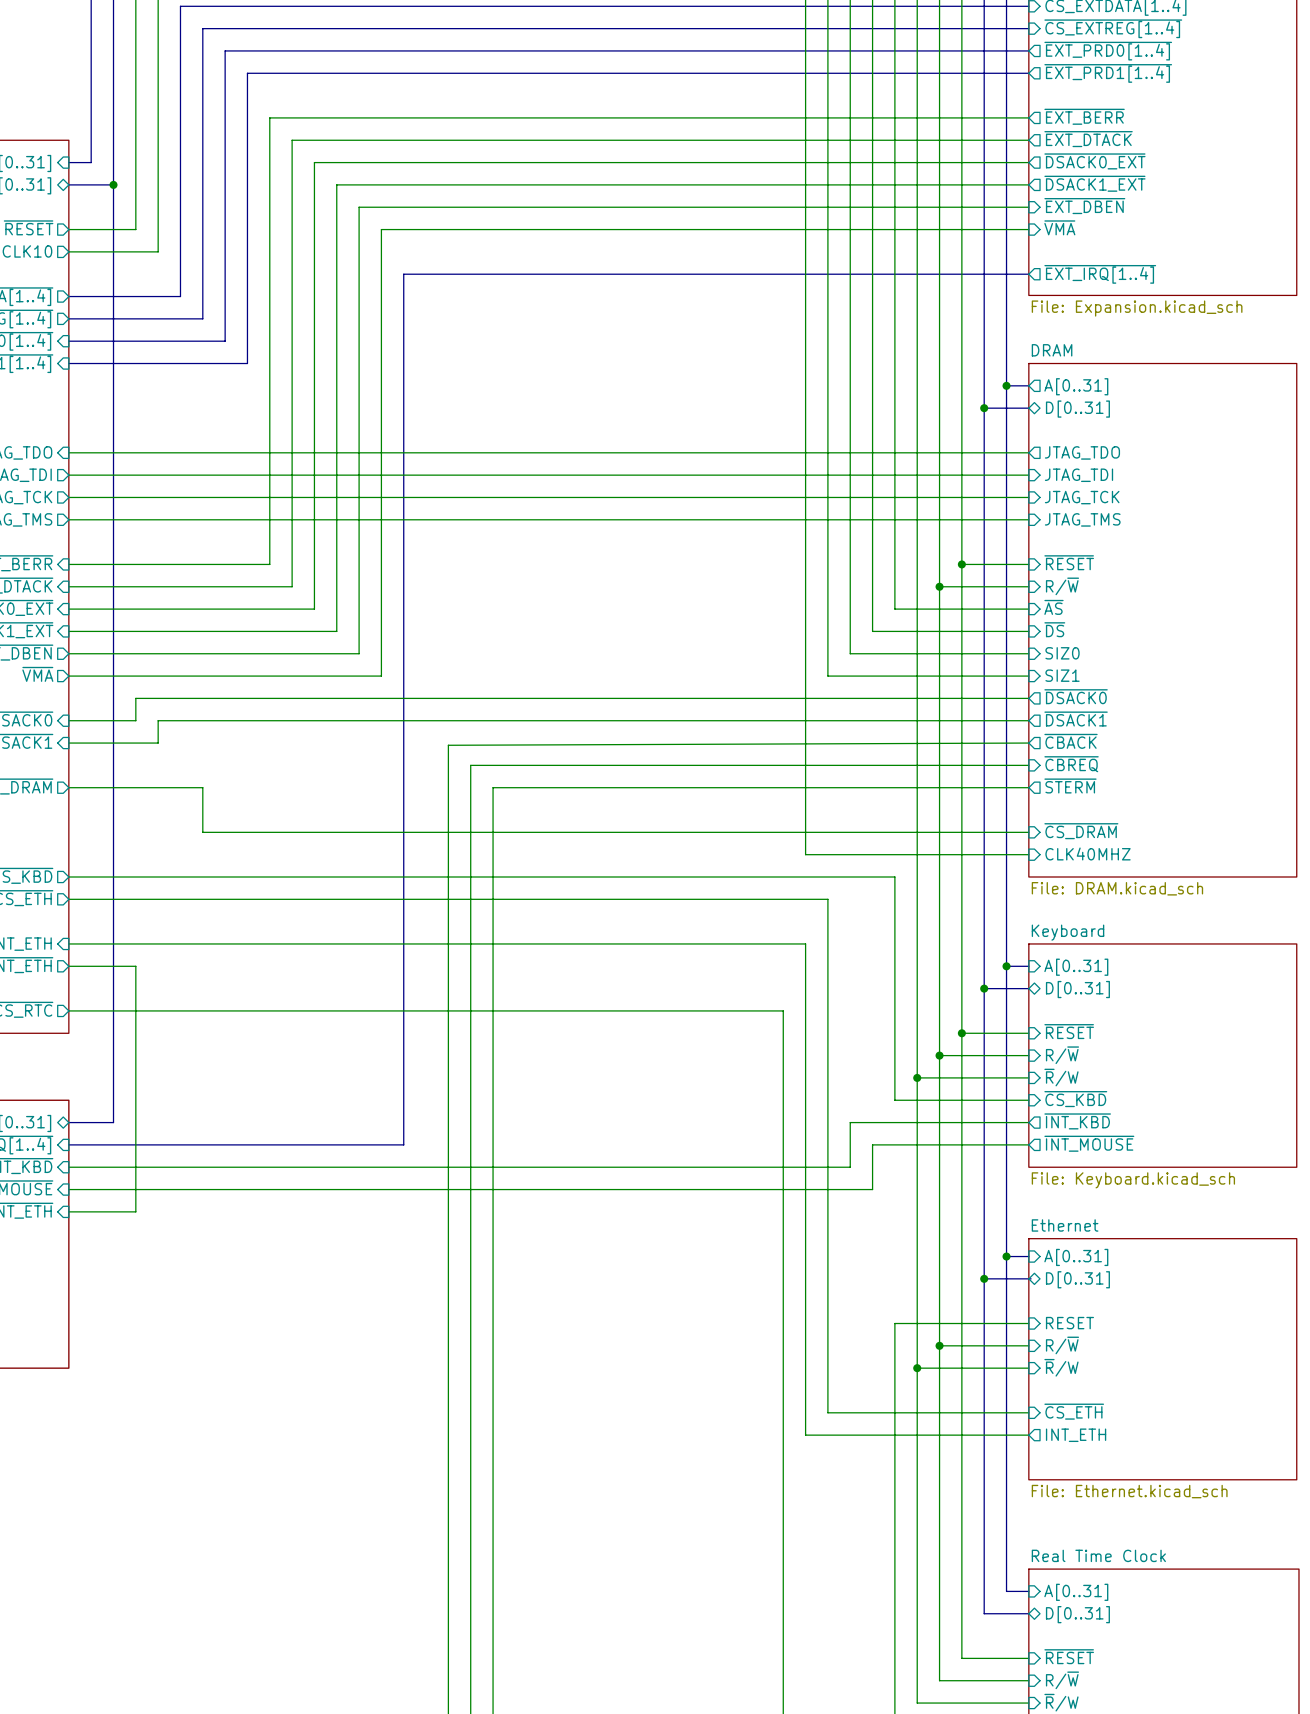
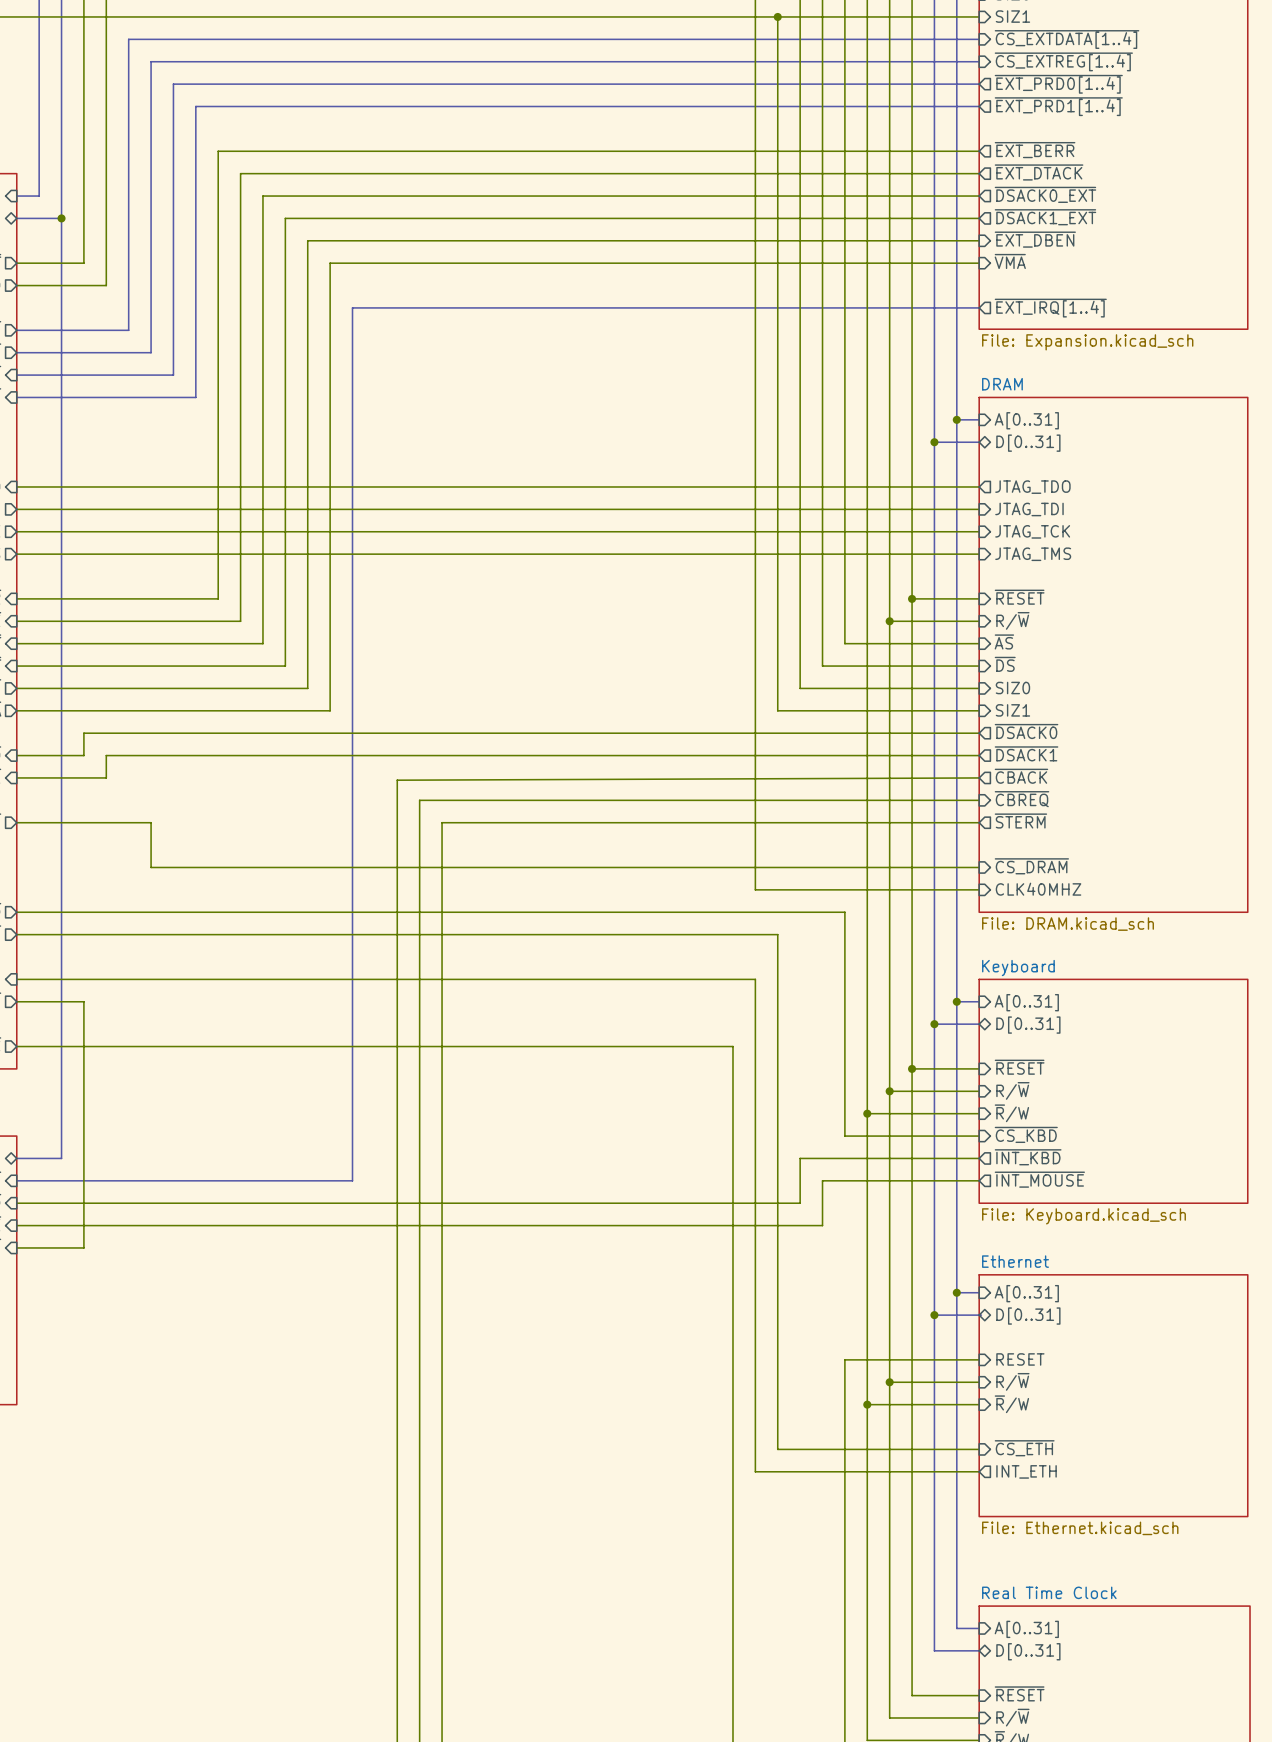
sheet pin shape: output (1076, 386) -> input (1026, 420)

